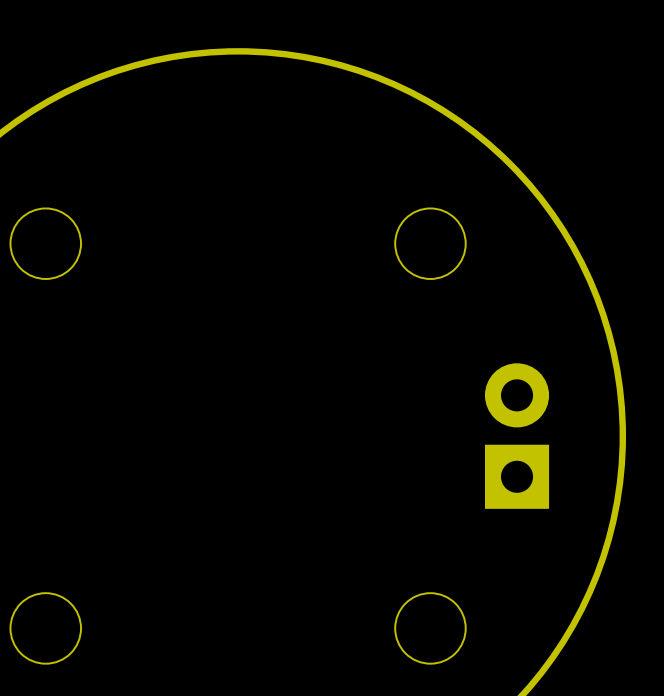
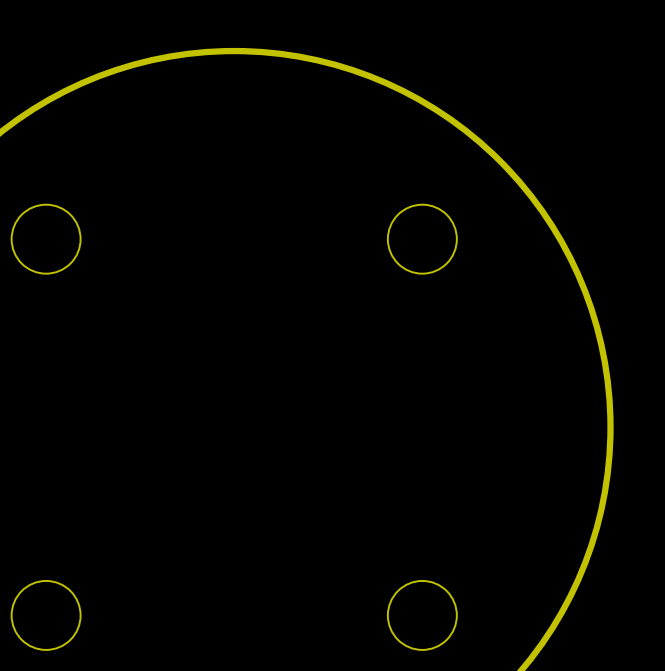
part: (517, 436) -> none

